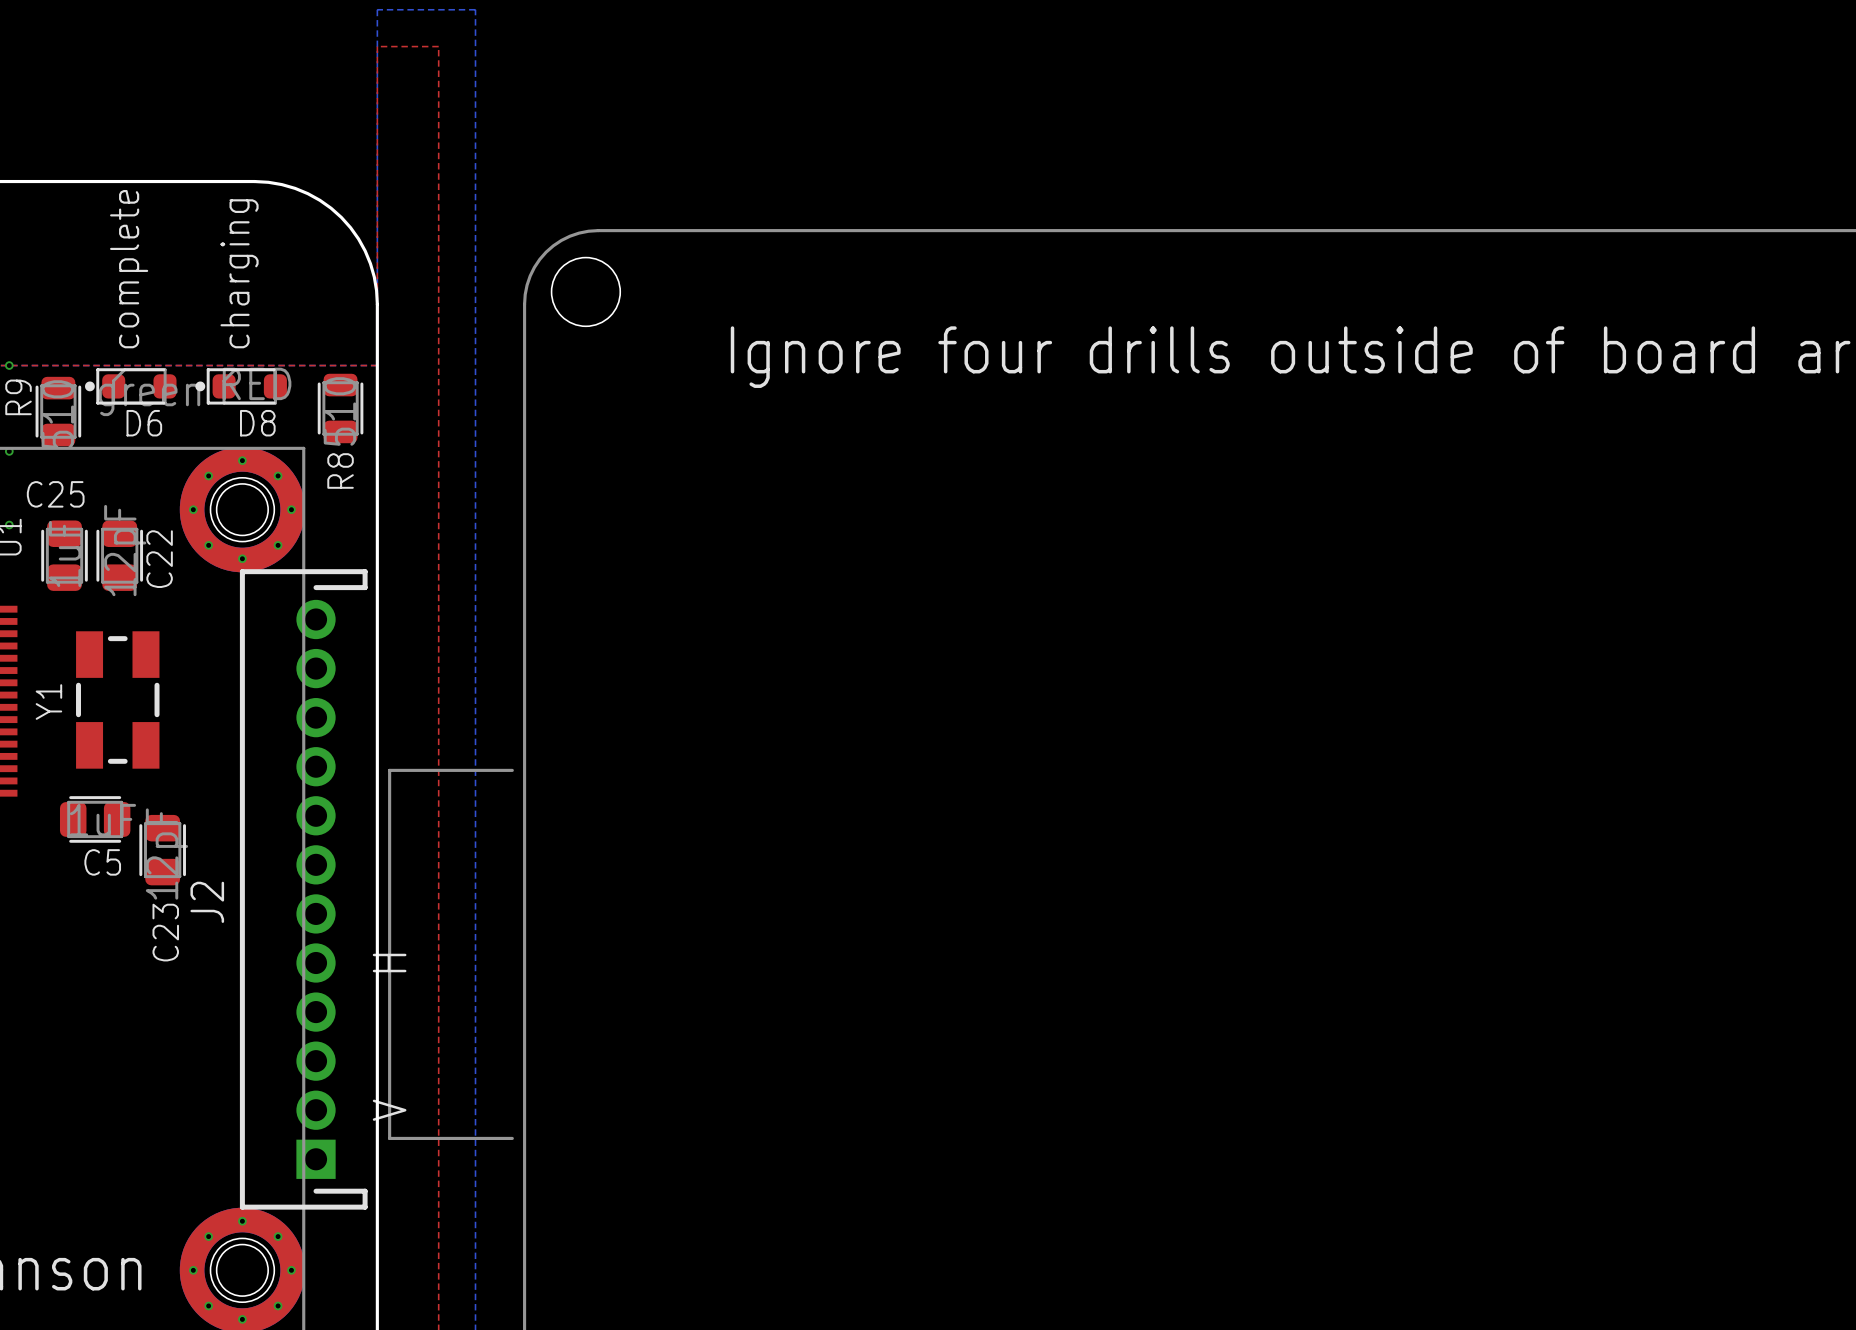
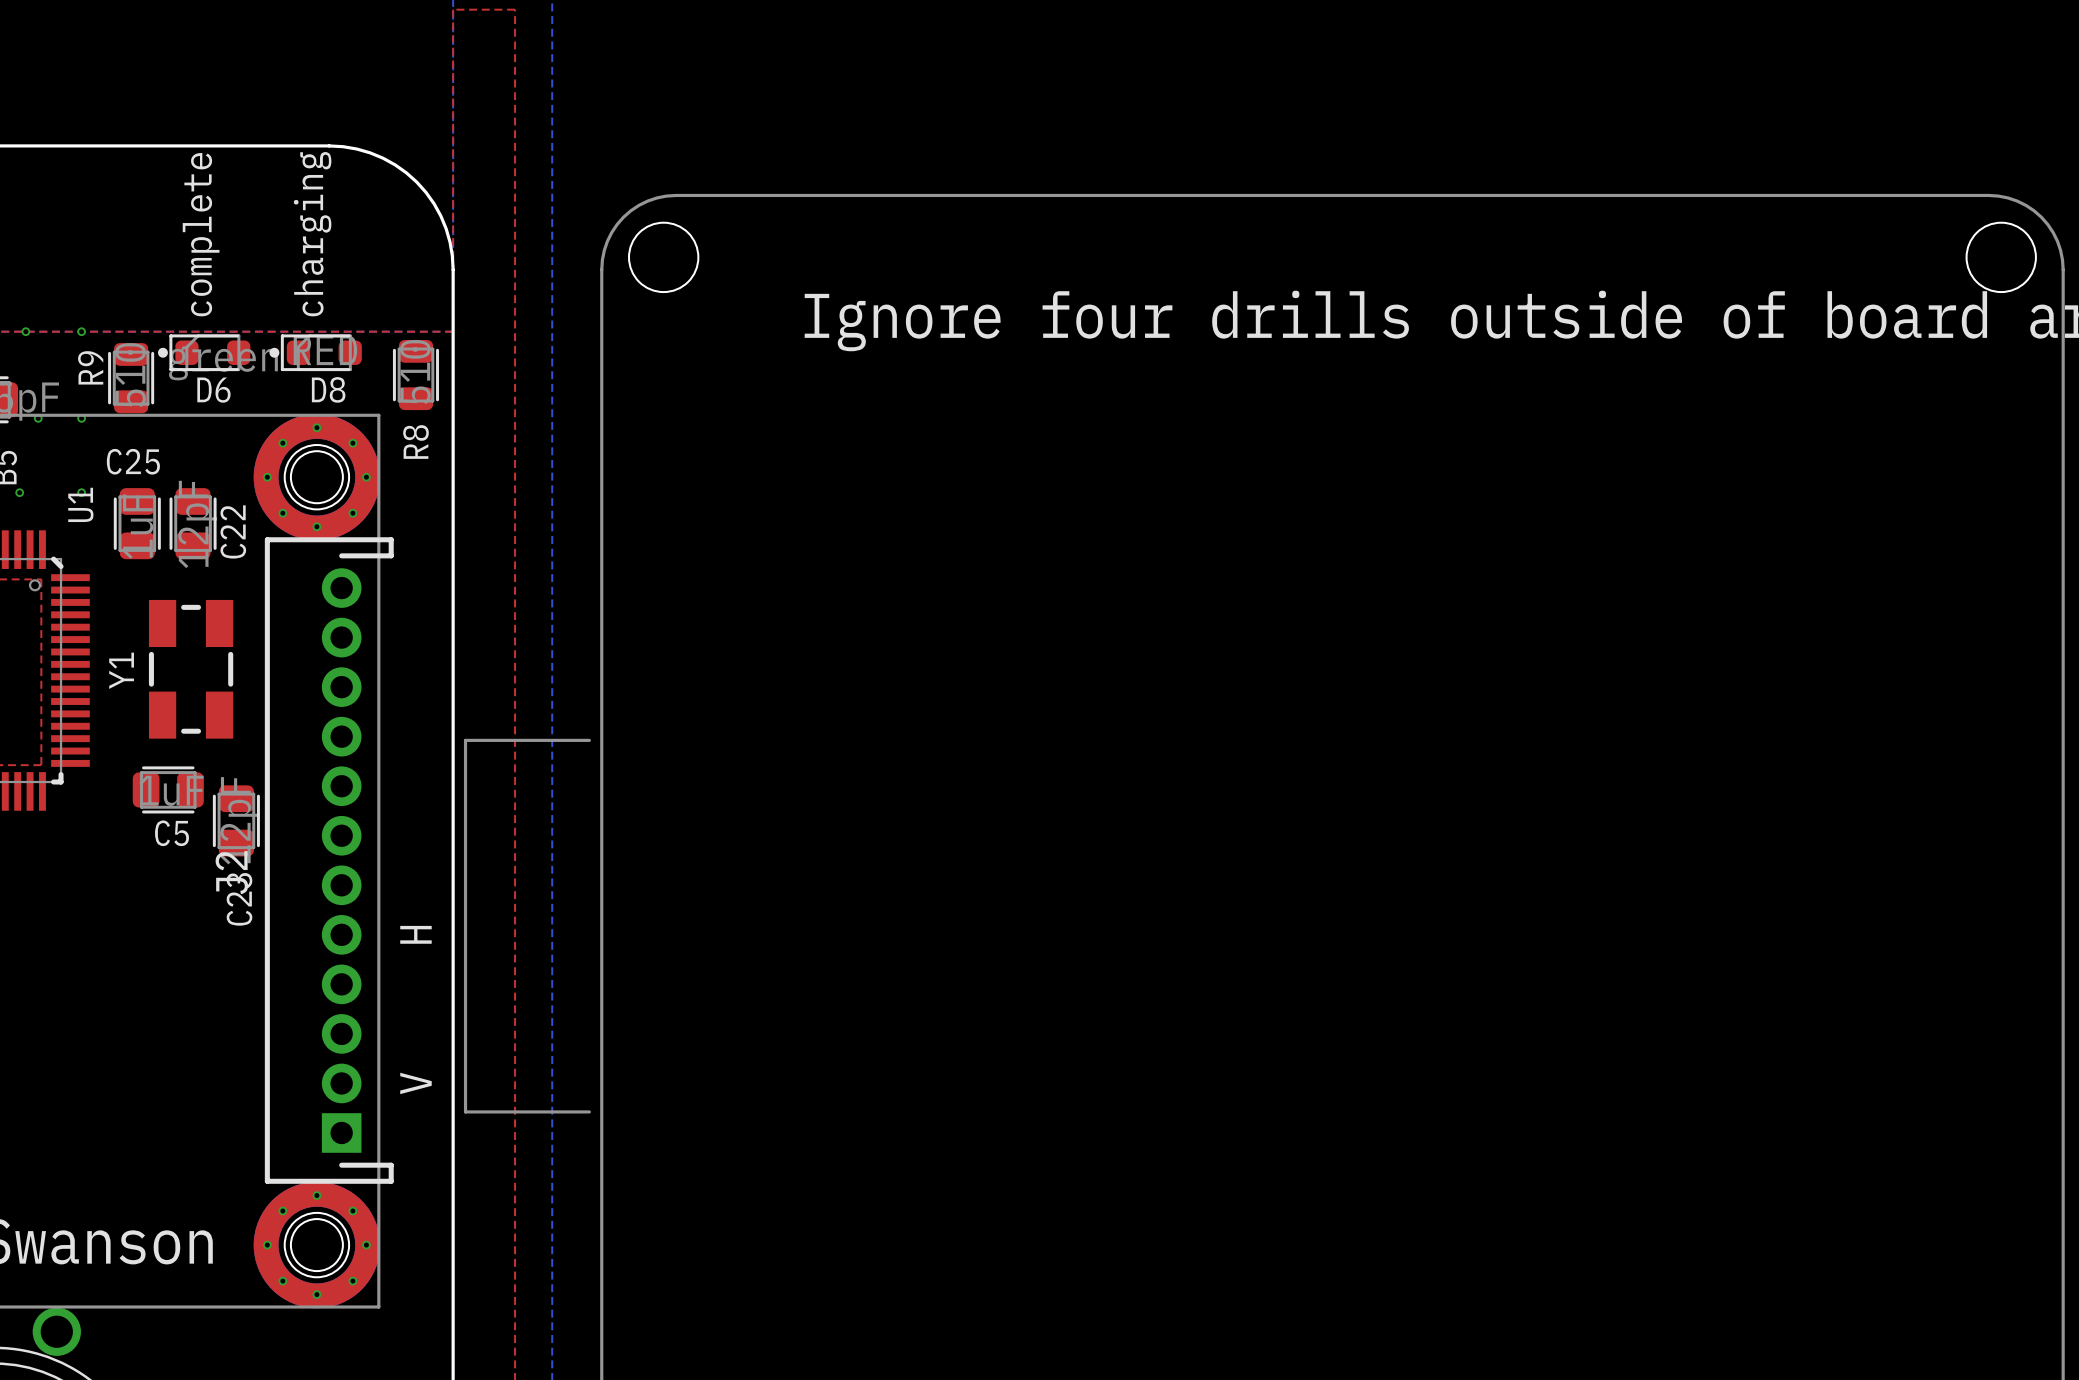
J2 position: (303, 889) -> (329, 860)

